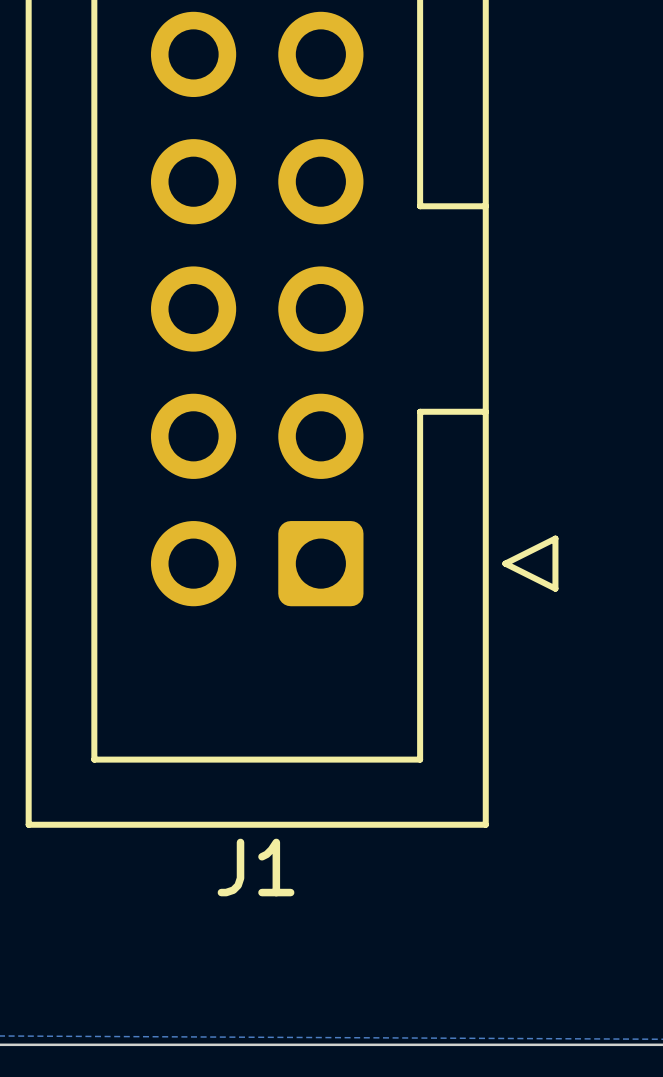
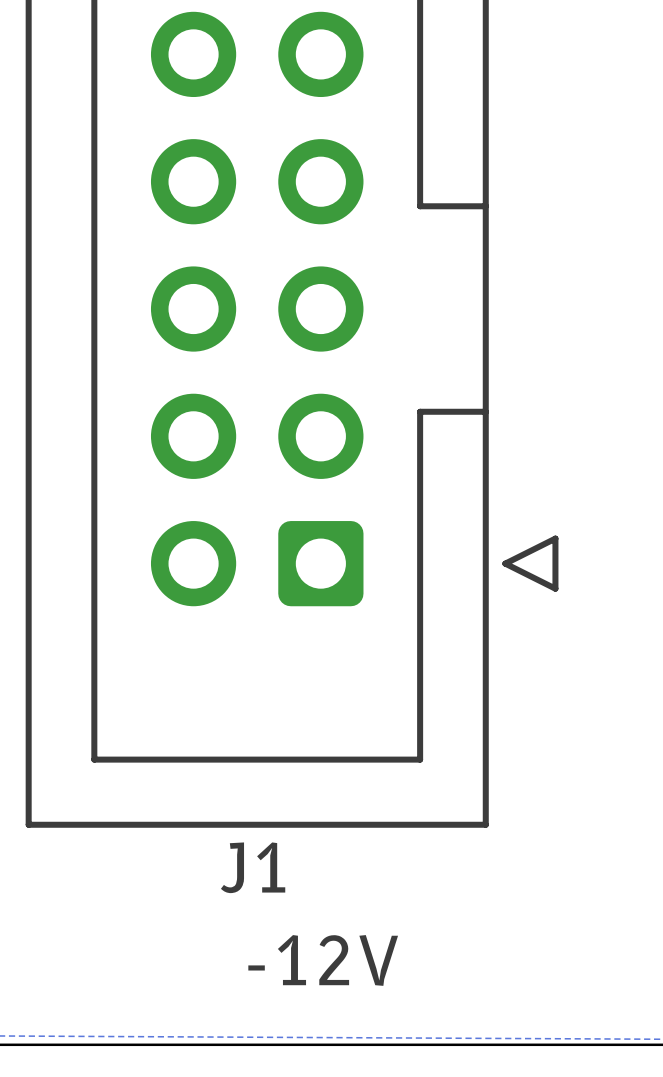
text: none -> -12V (323, 960)

